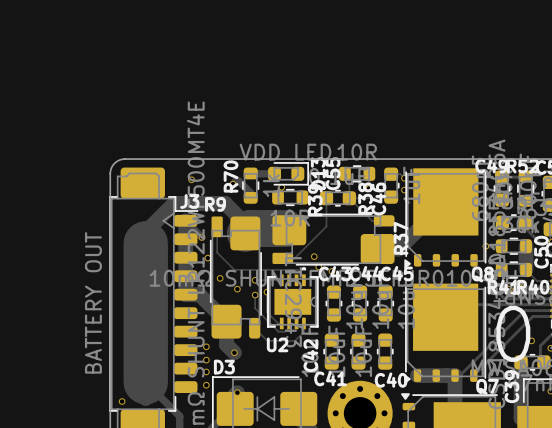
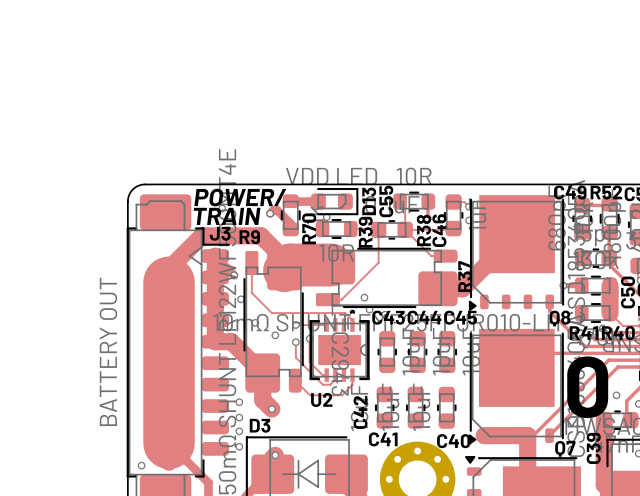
text: none -> POWER/ (240, 197)
R70 name position: R70 (231, 176) -> R70 (309, 228)
text: none -> TRAIN (227, 216)

